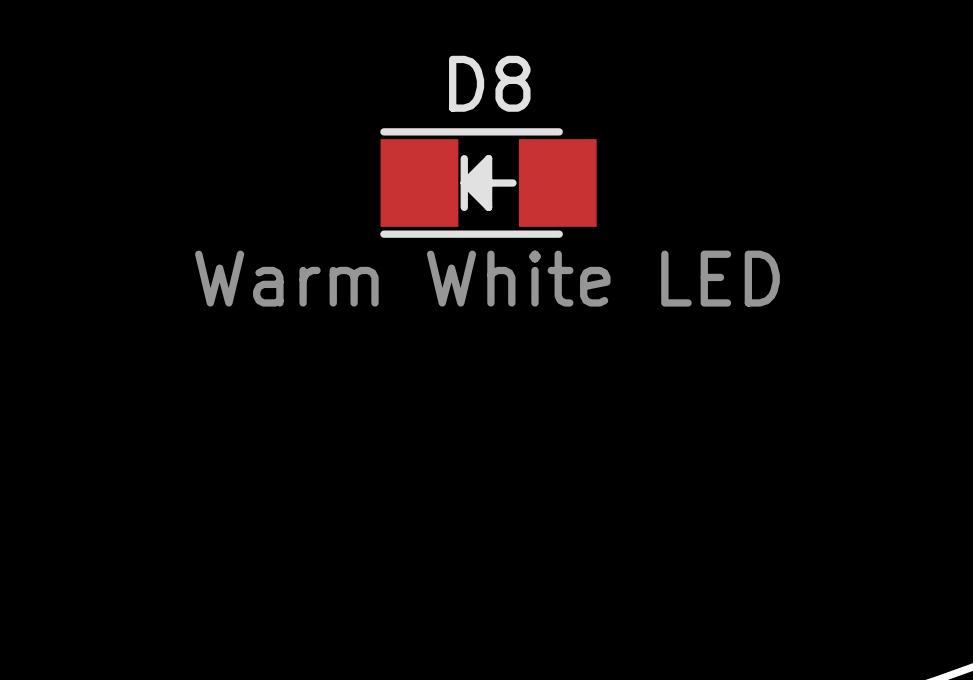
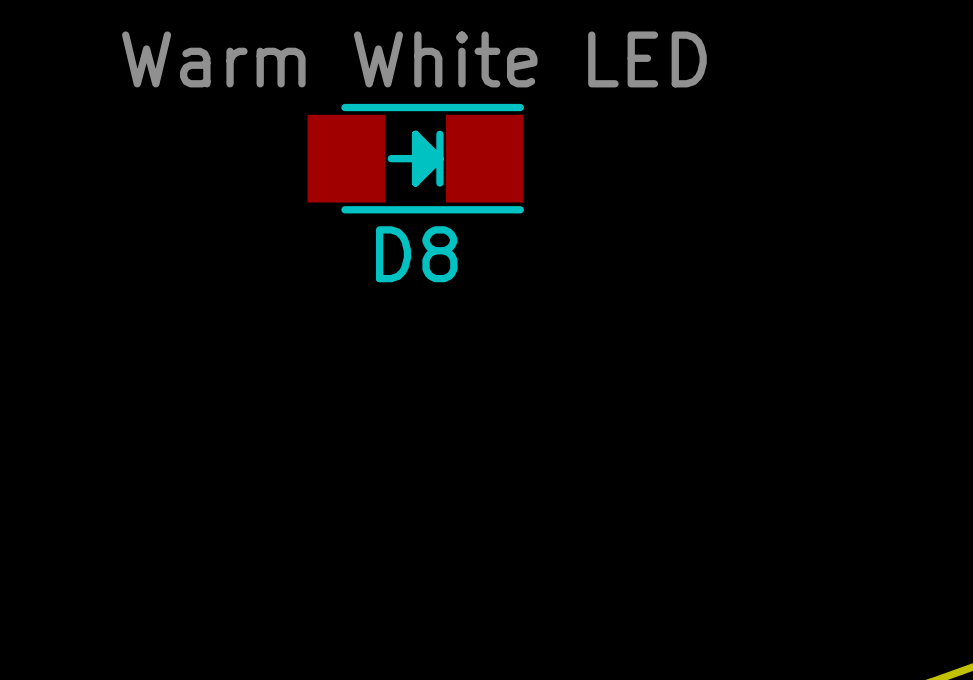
D8 rotation: 0° (488, 183) -> 180° (415, 158)

